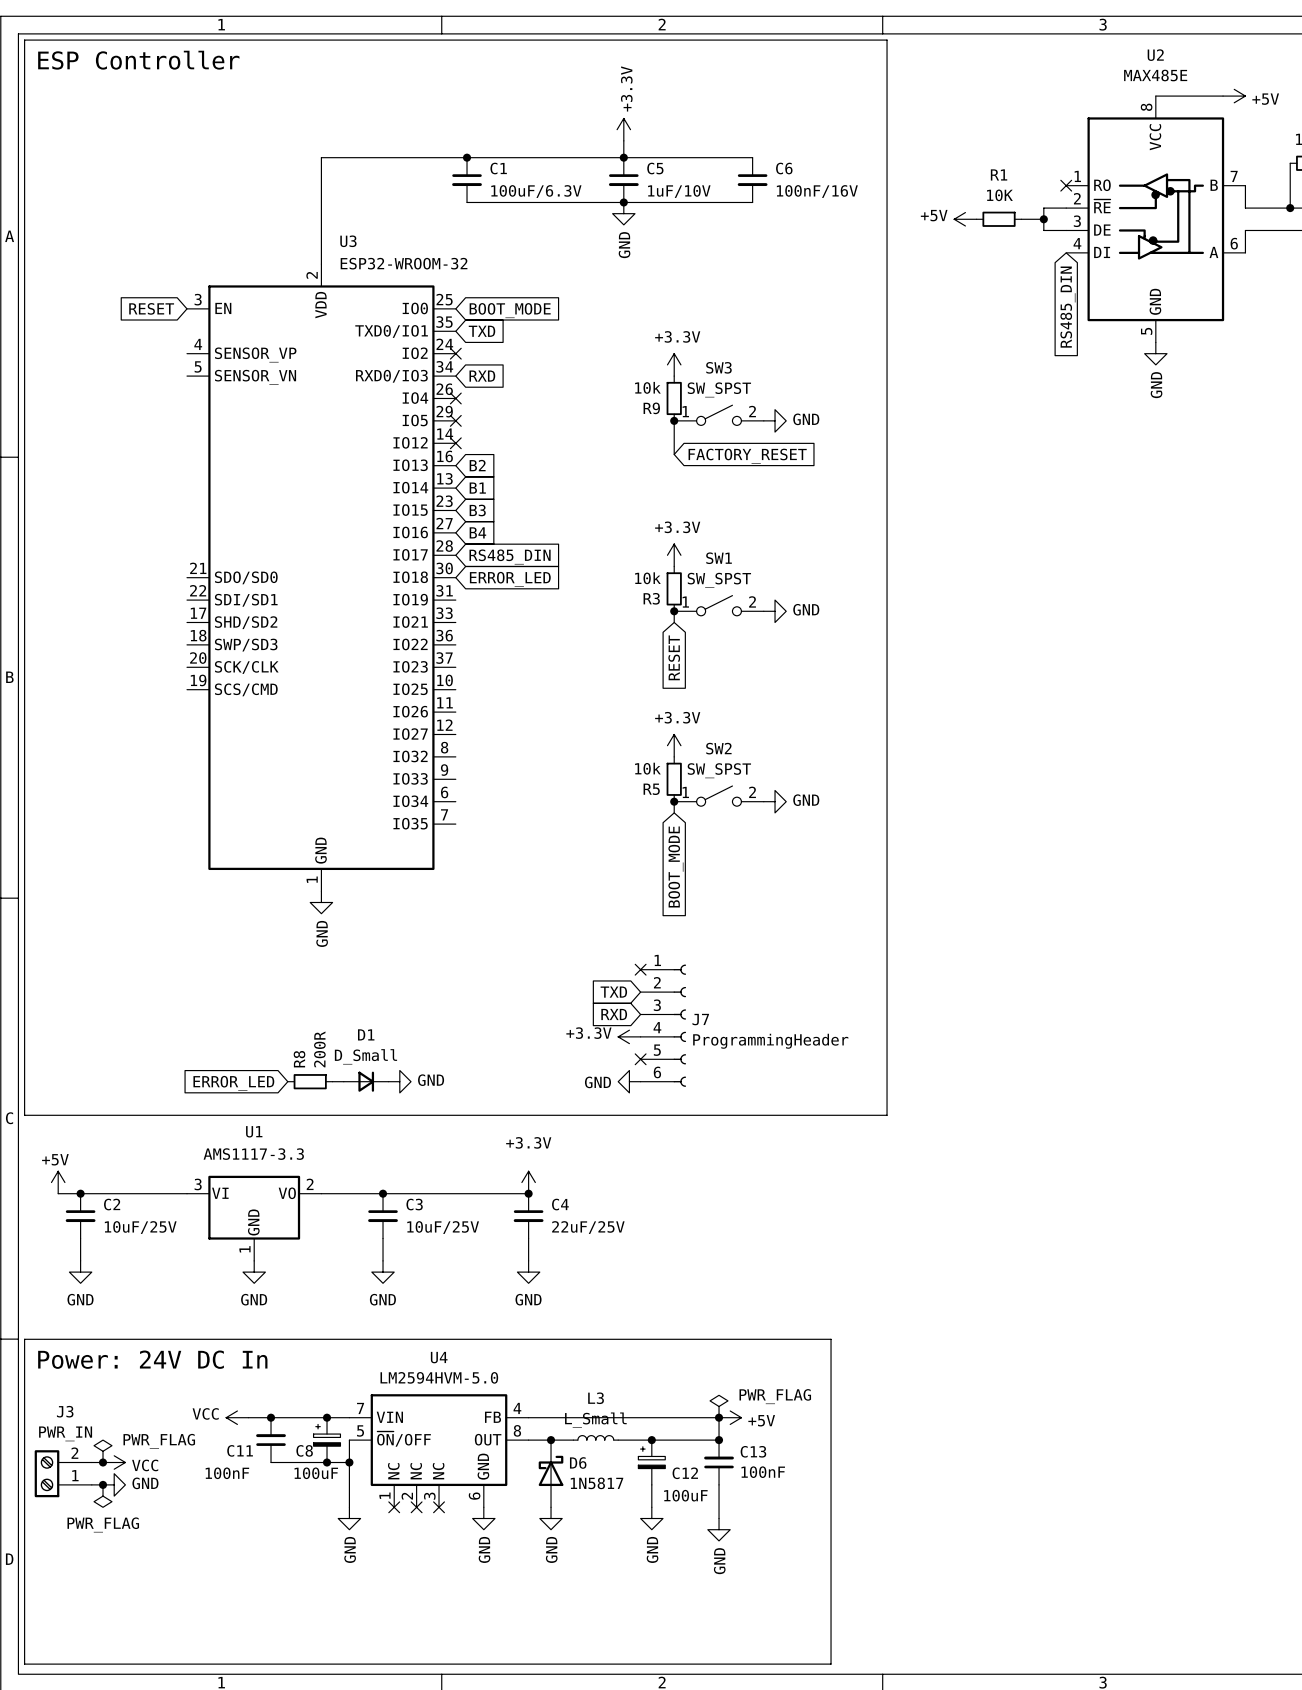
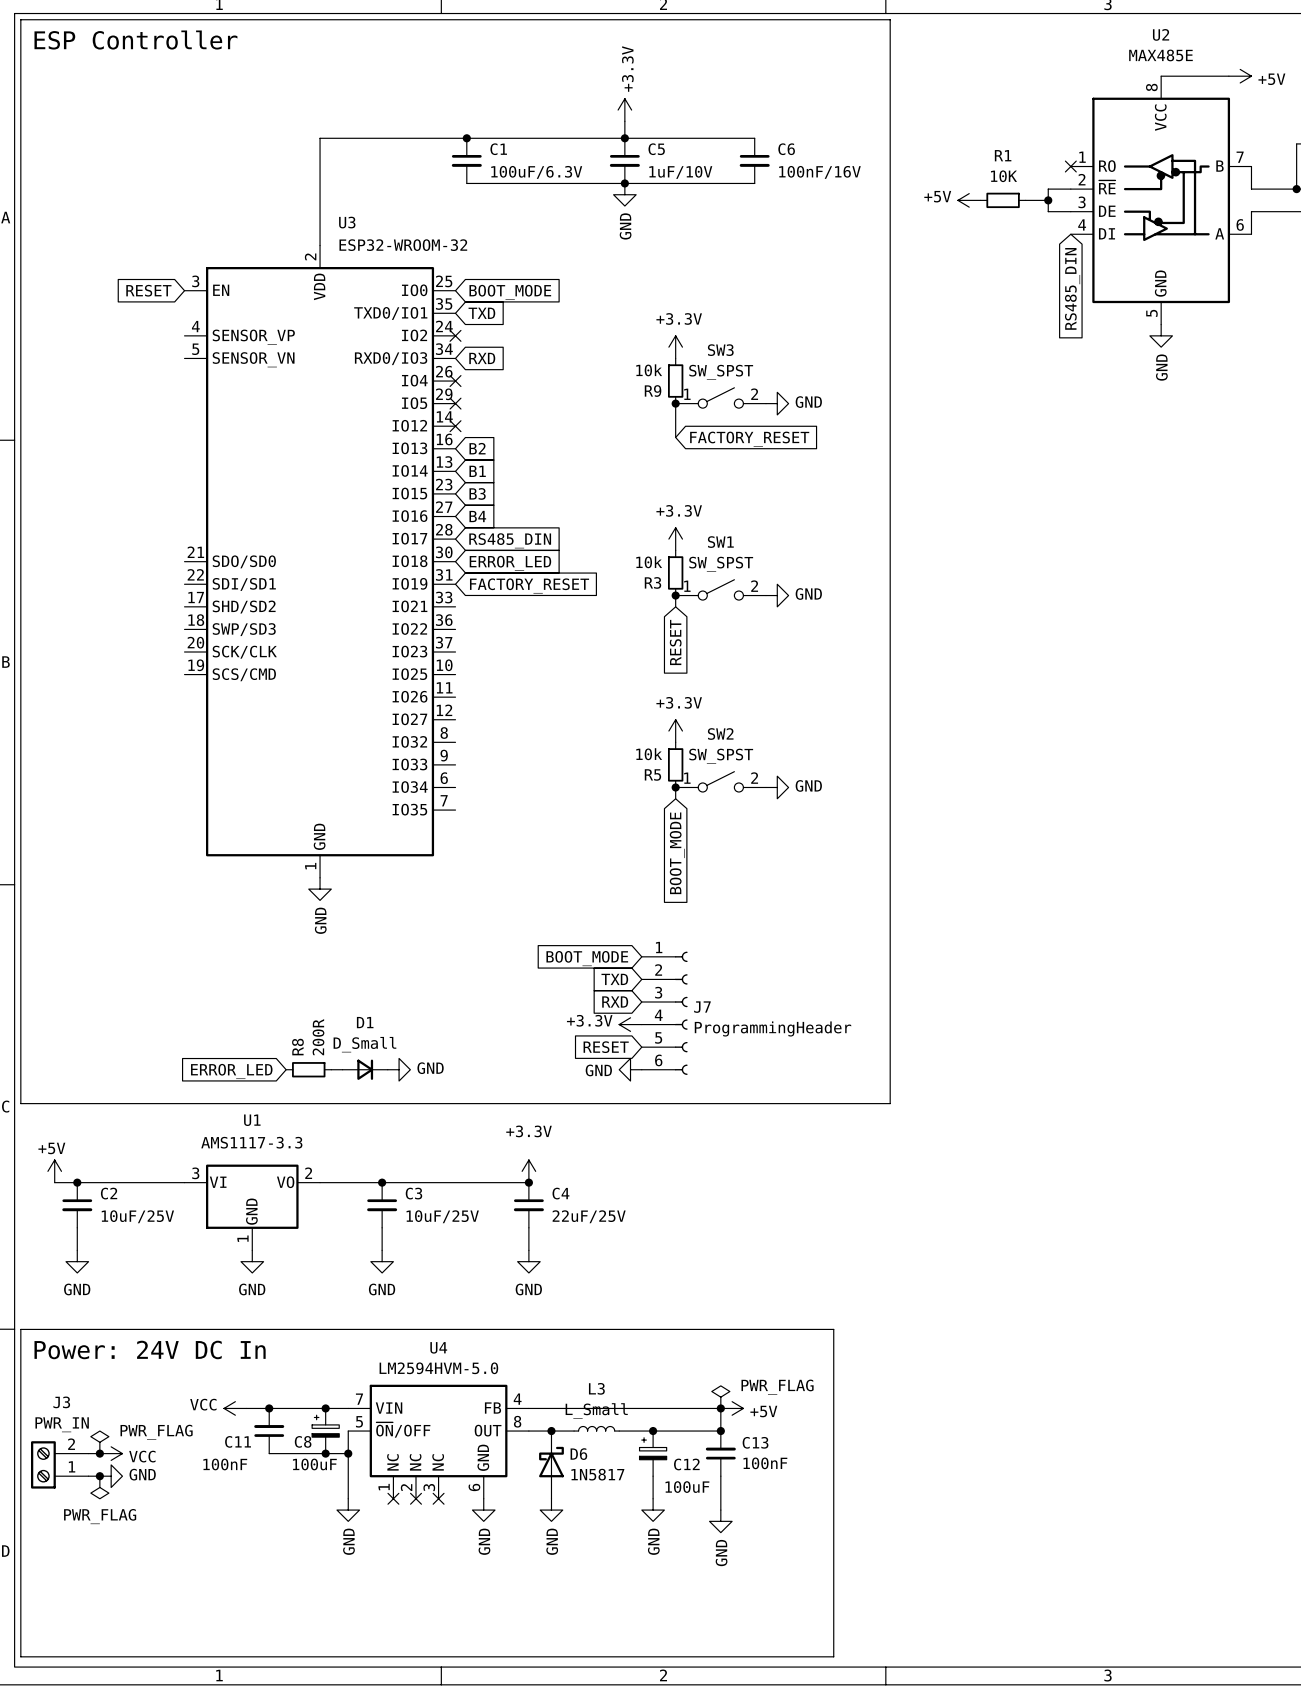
global label: none -> FACTORY_RESET (529, 585)
no-connect mark: (640, 969) -> none
global label: none -> BOOT_MODE (587, 958)
global label: none -> RESET (606, 1047)
no-connect mark: (640, 1059) -> none

